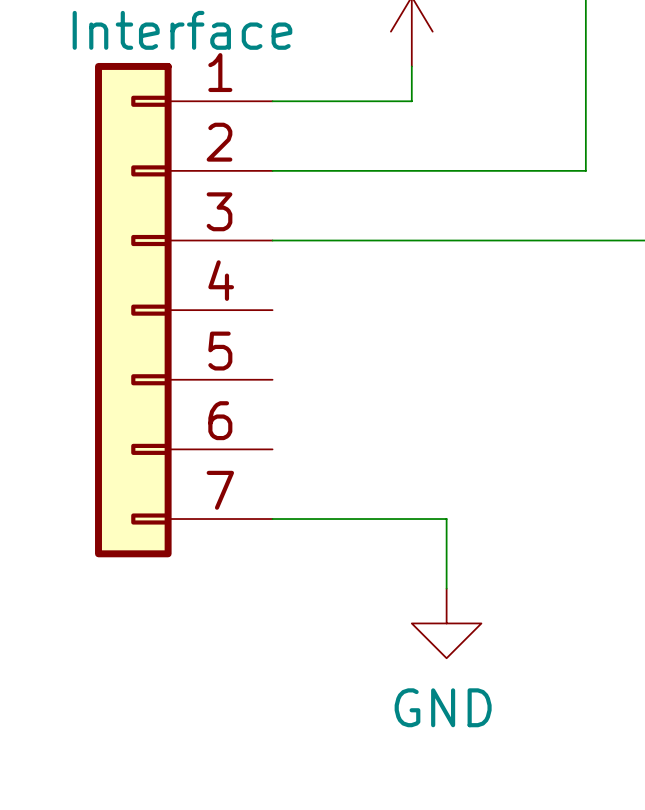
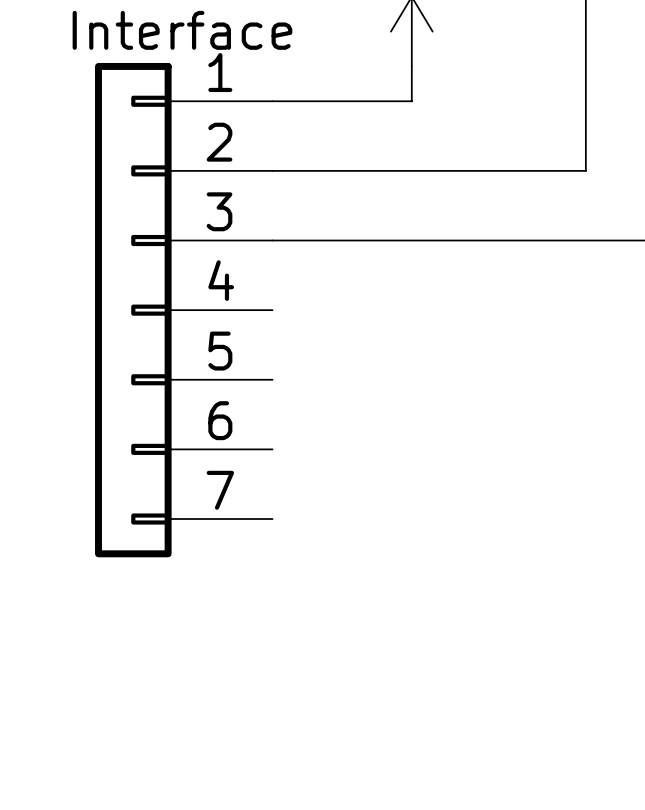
wire: (272, 519) (446, 519) (446, 588) -> none
power symbol: GND (446, 623) -> none

